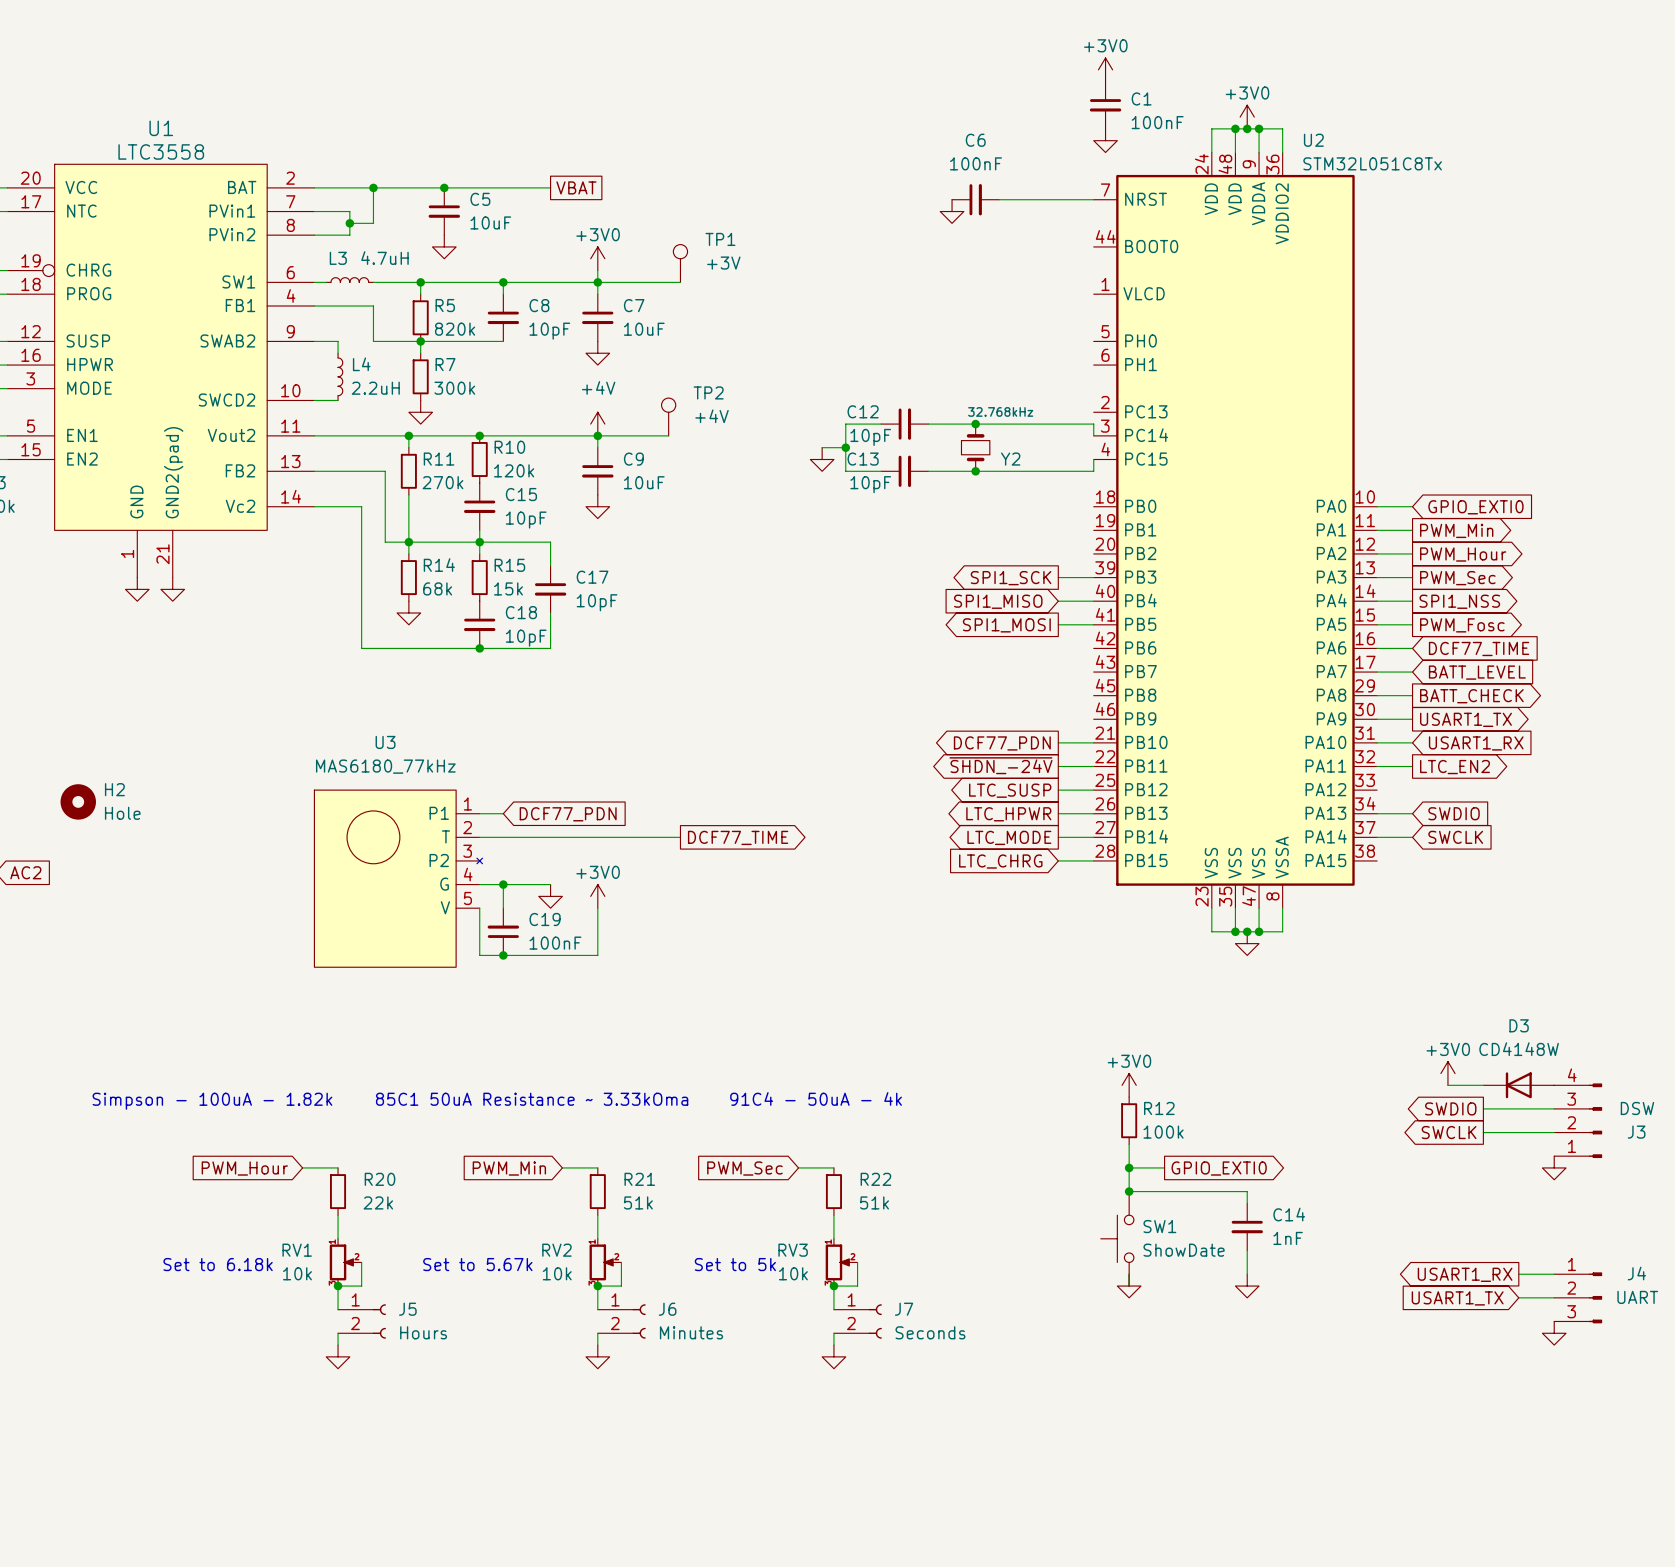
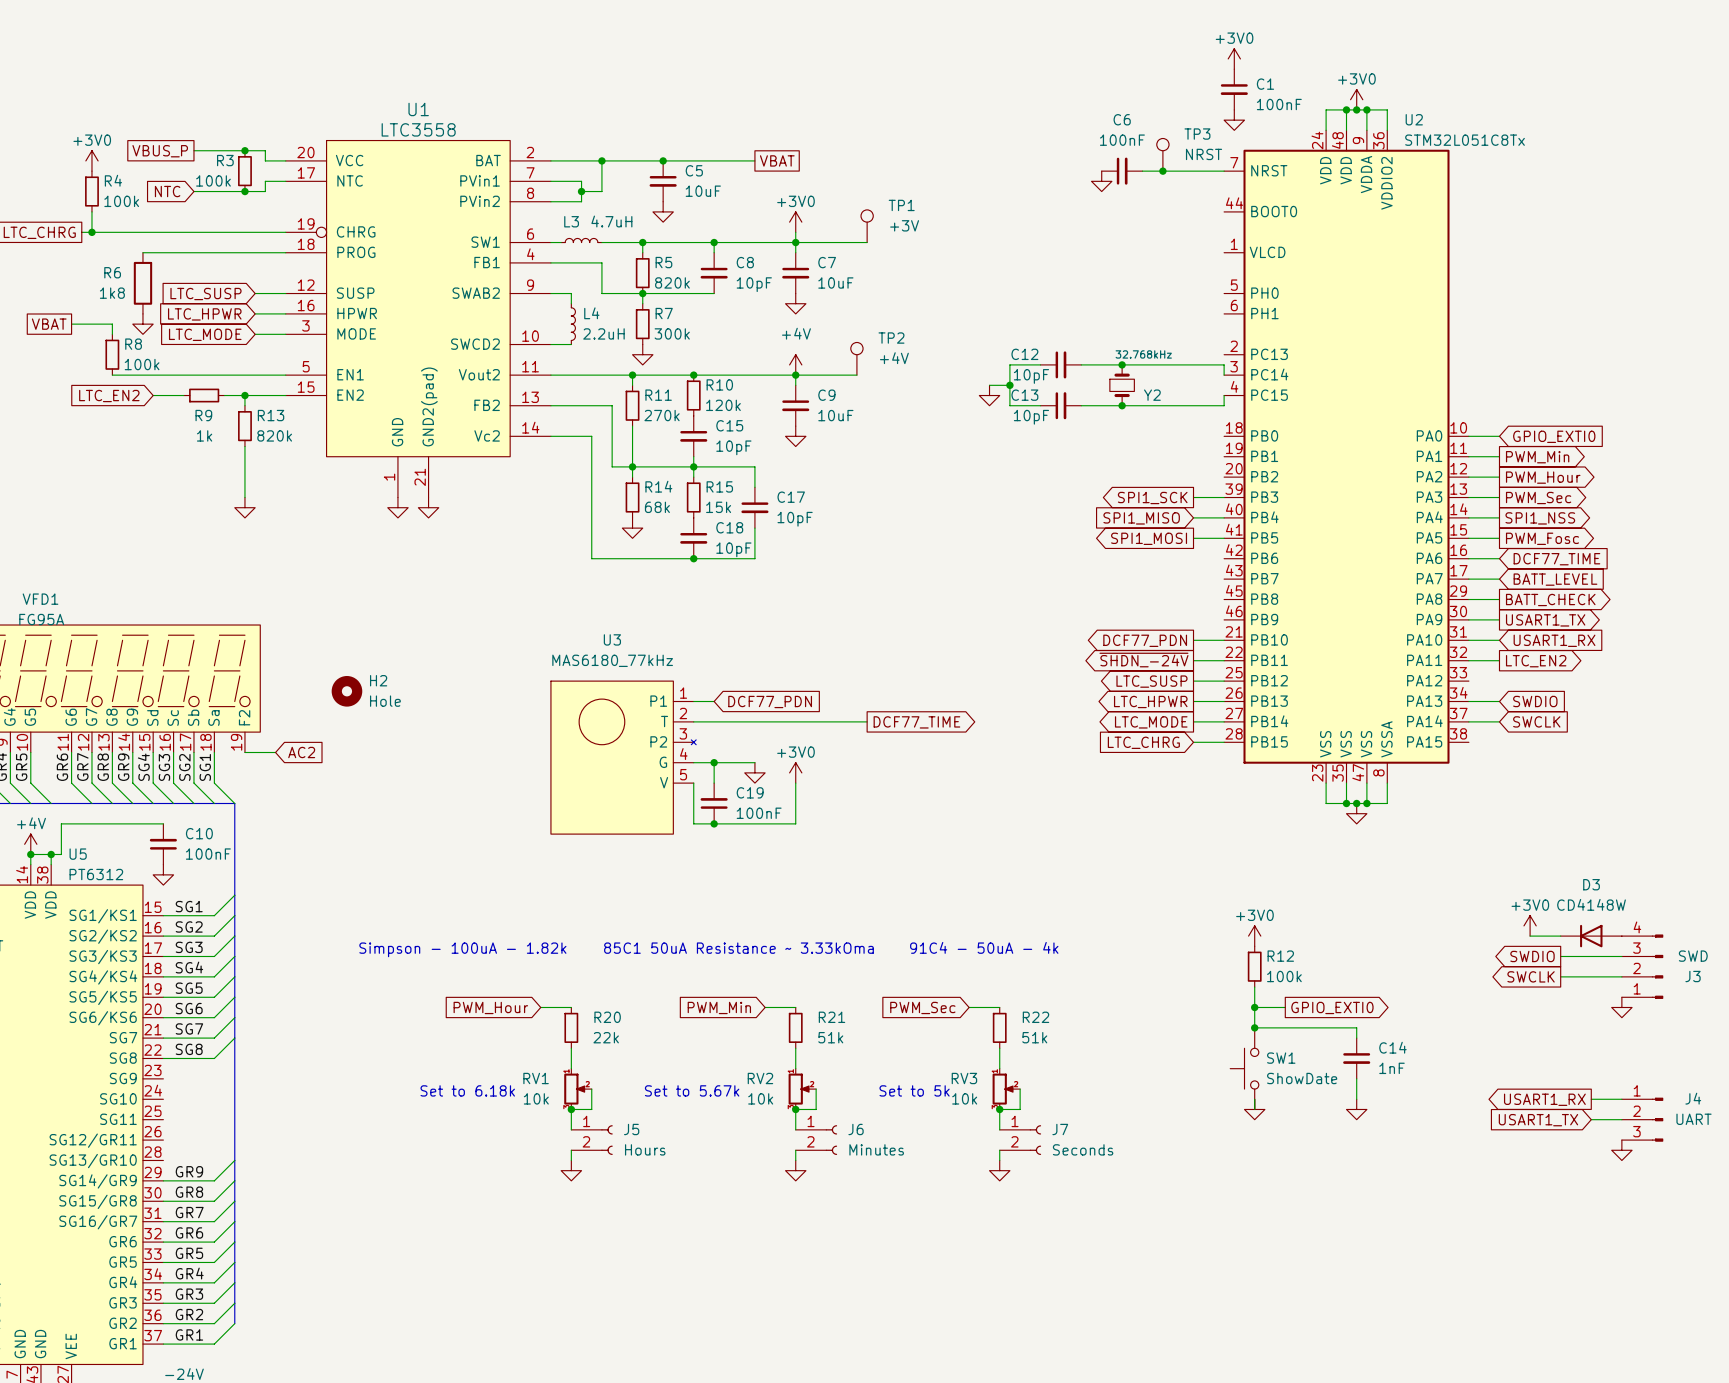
TP3: none -> NRST (1162, 154)
junction: none -> (1162, 171)
J3 value: DSW (1637, 1108) -> SWD (1693, 956)

